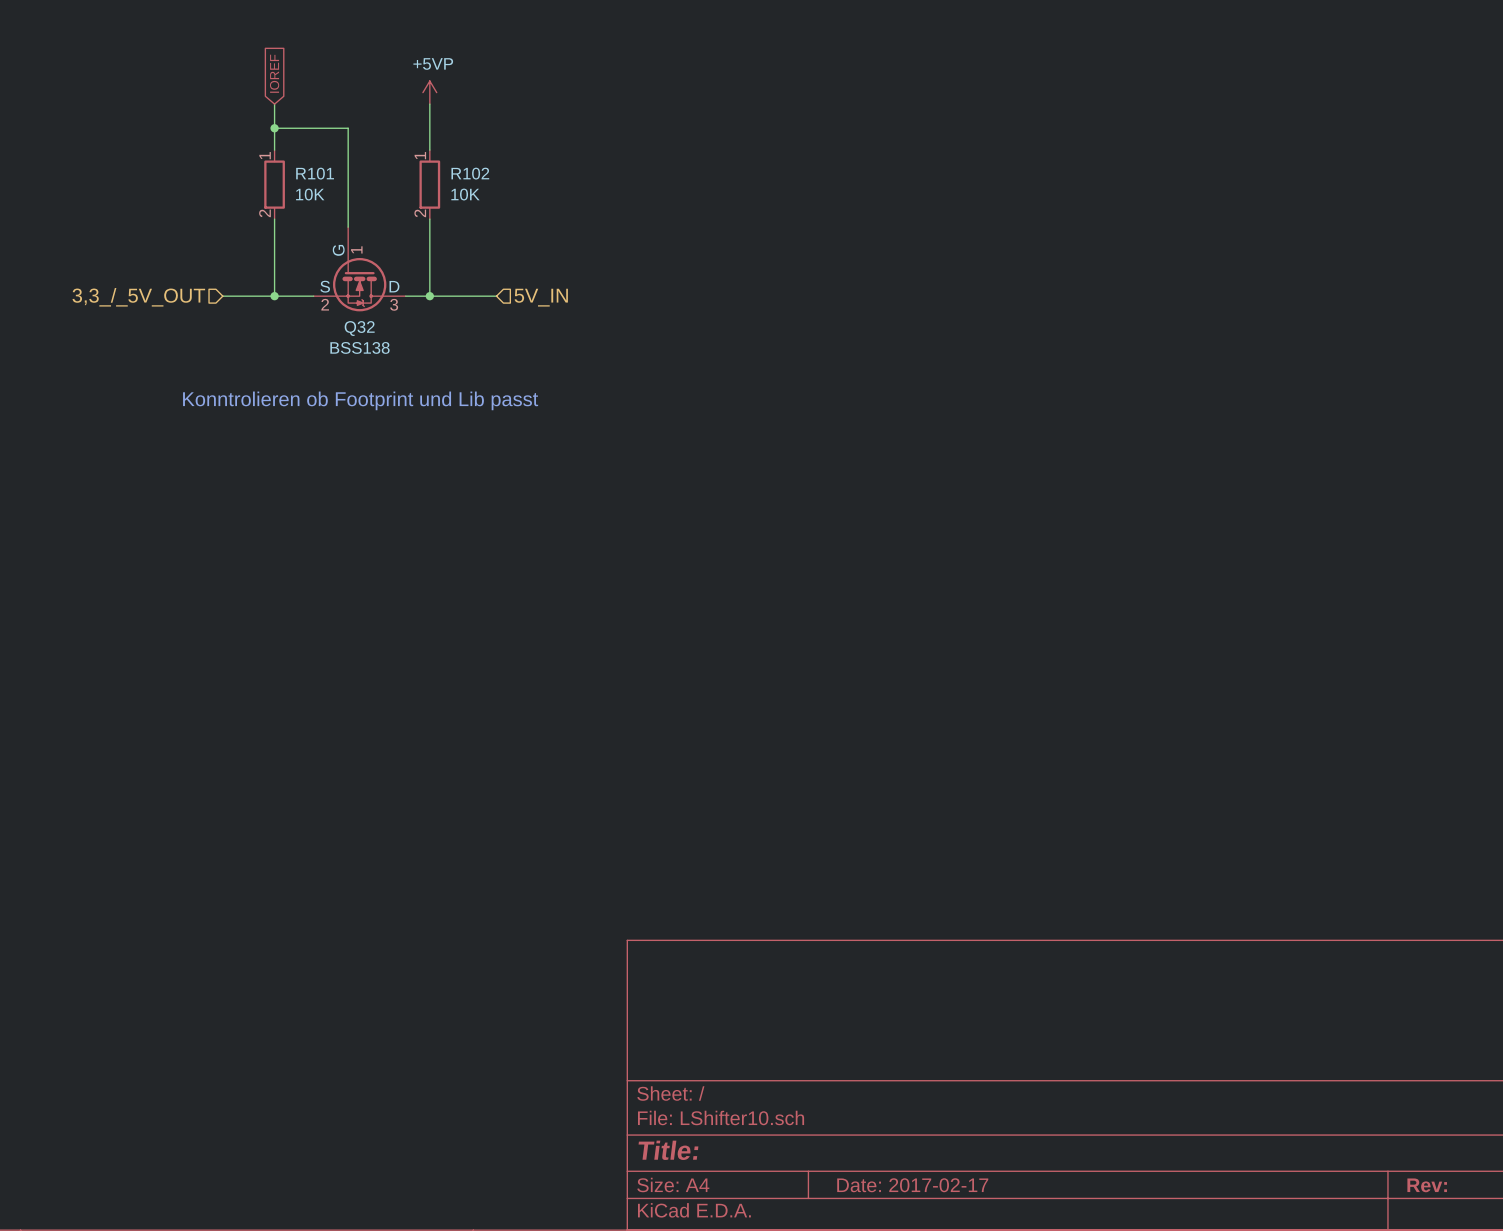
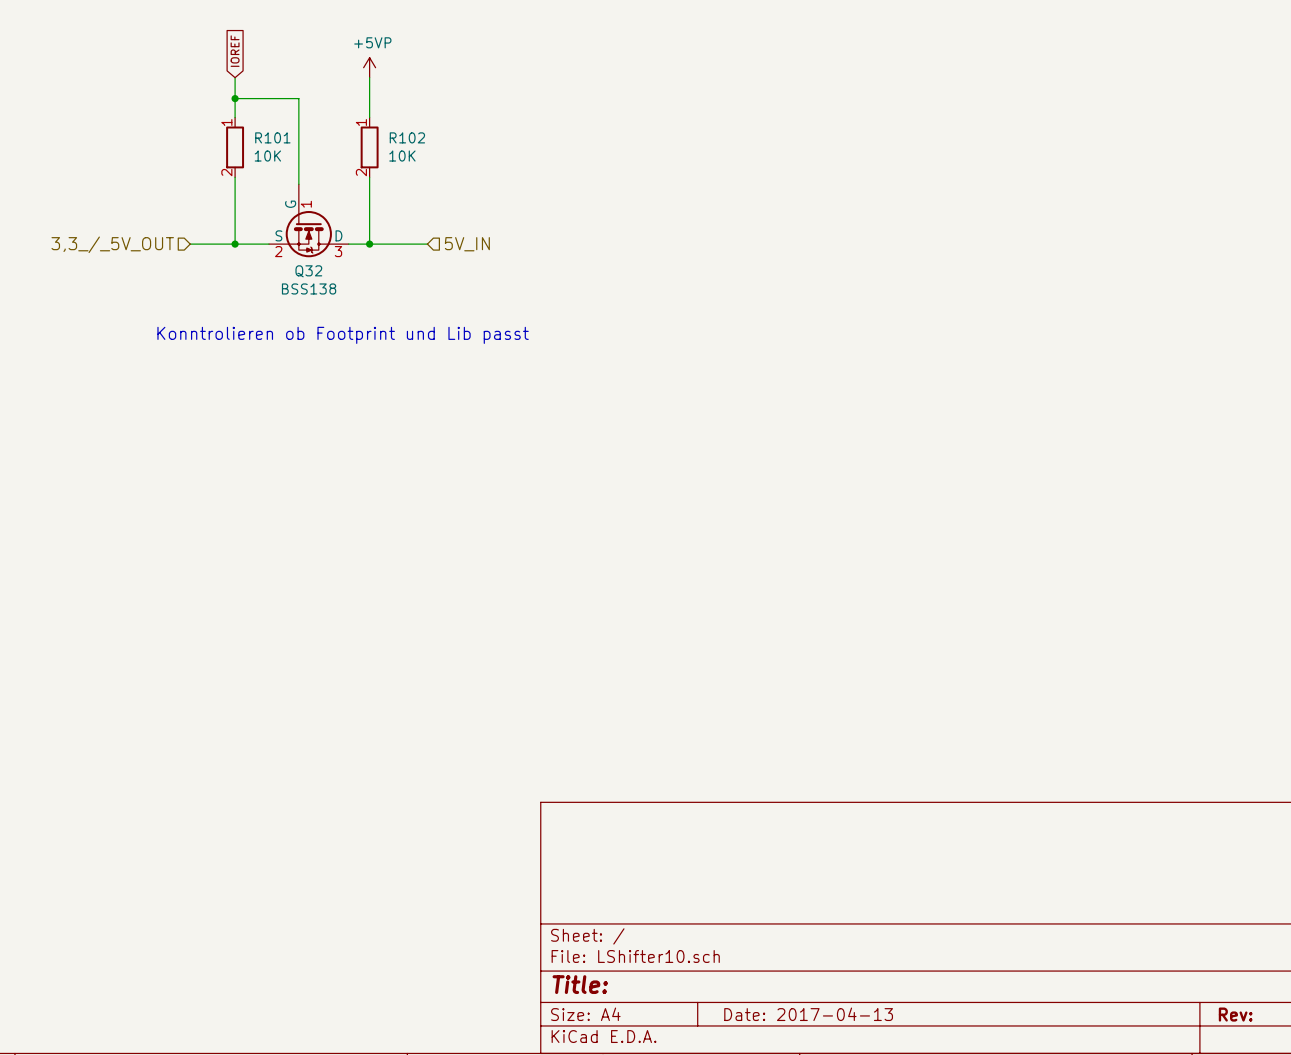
title block: Date: 2017-02-17 (912, 1185) -> Date: 2017-04-13 (808, 1014)

